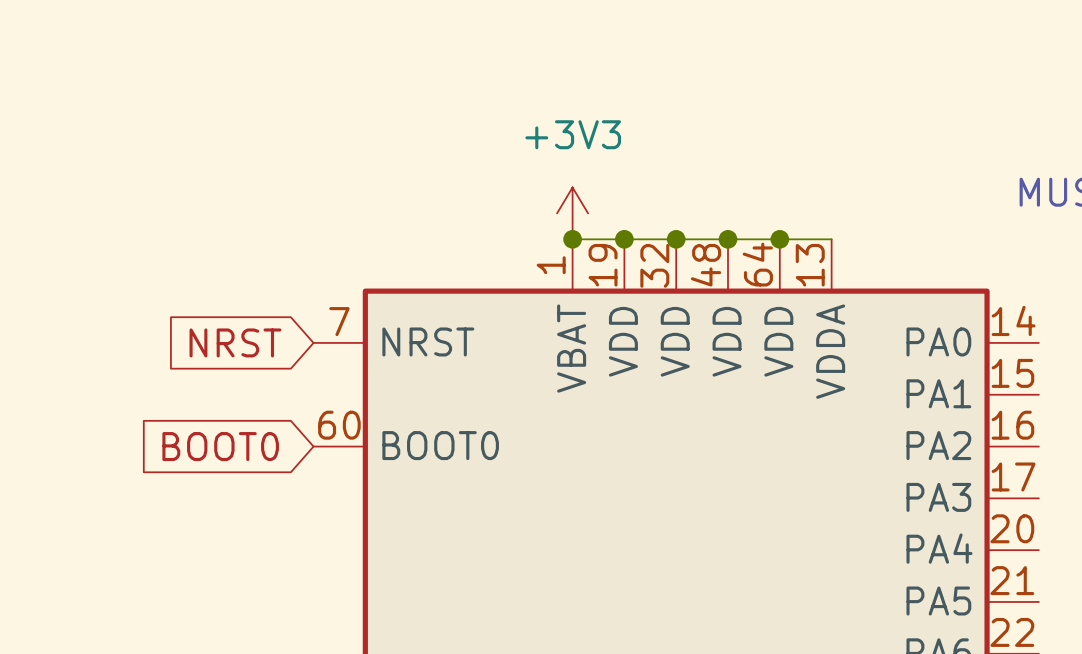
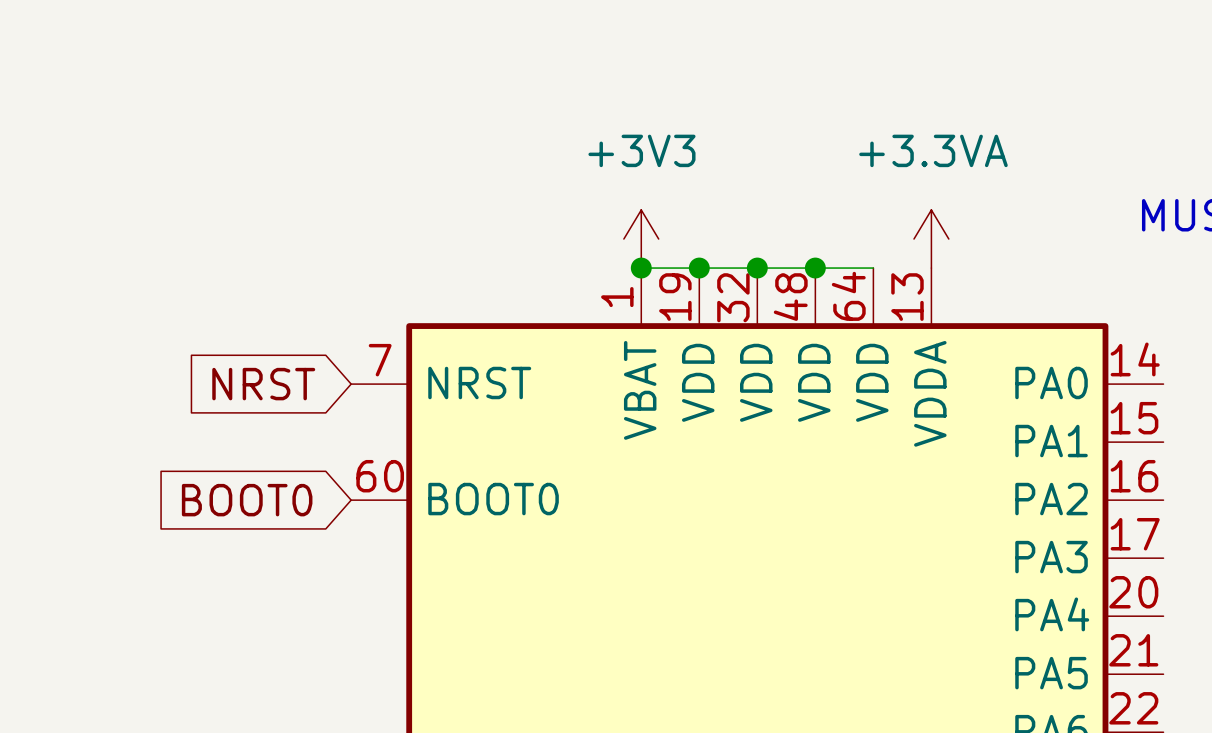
power symbol: none -> +3.3VA (931, 239)
wire: (779, 239) (831, 239) -> none
junction: (779, 239) -> none

